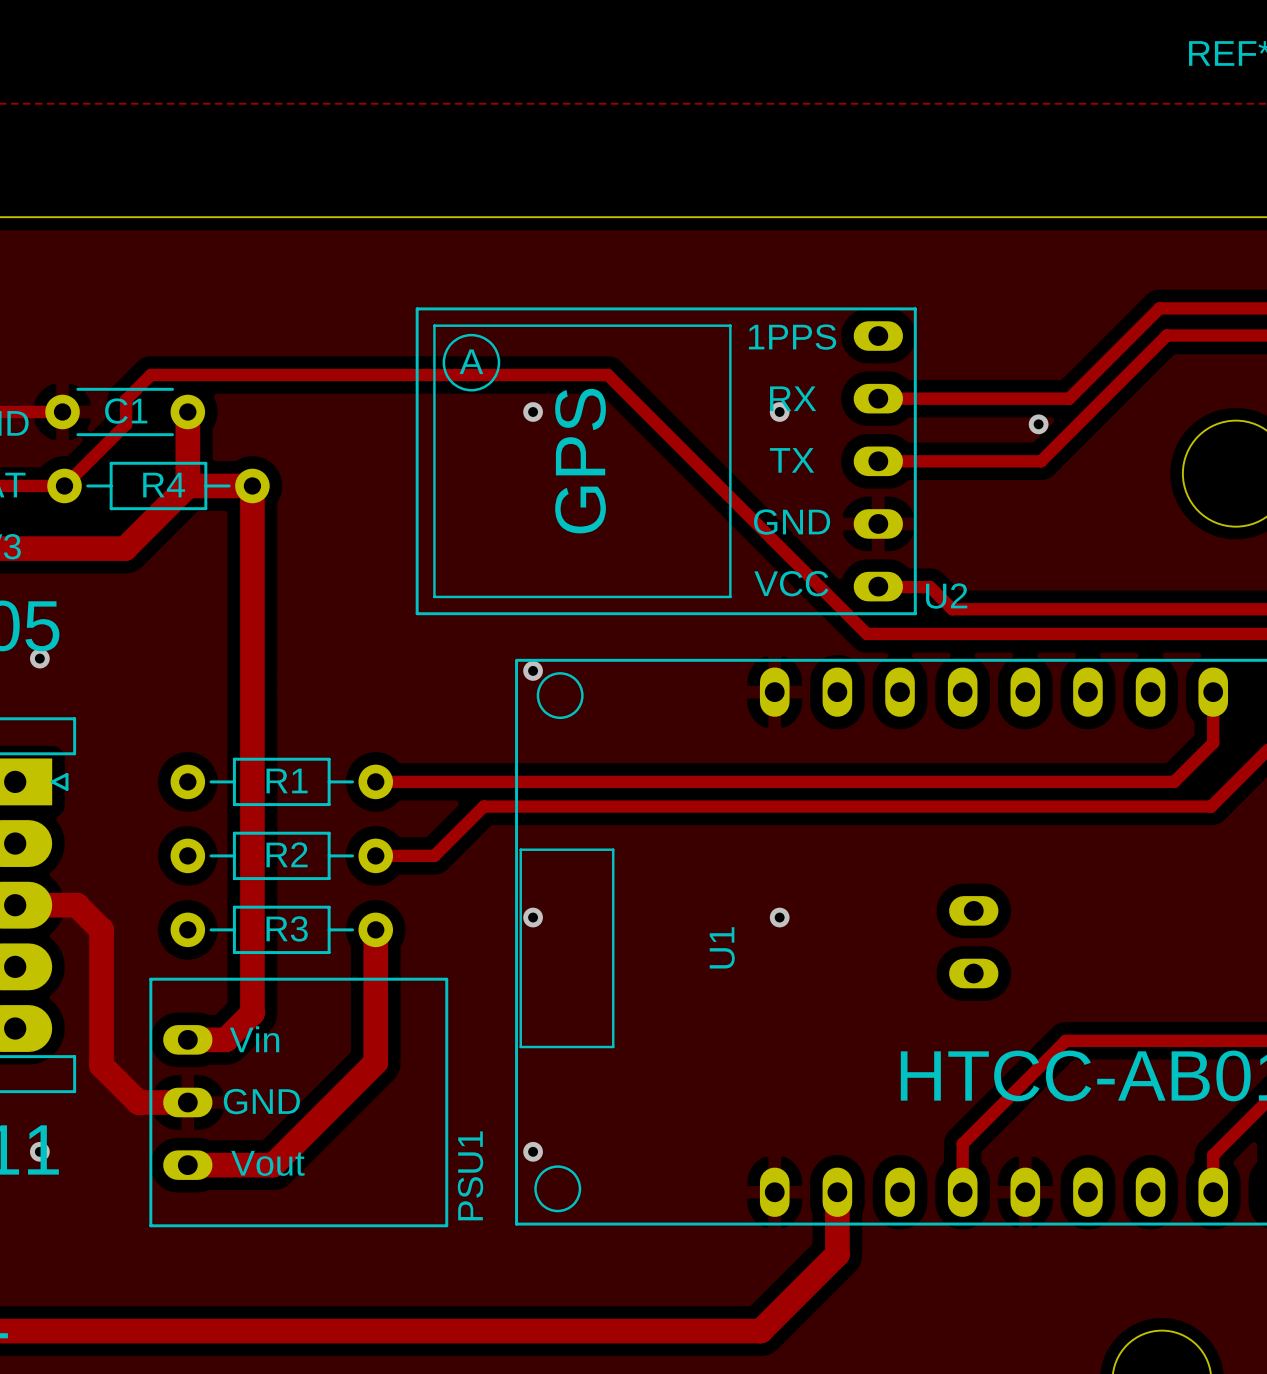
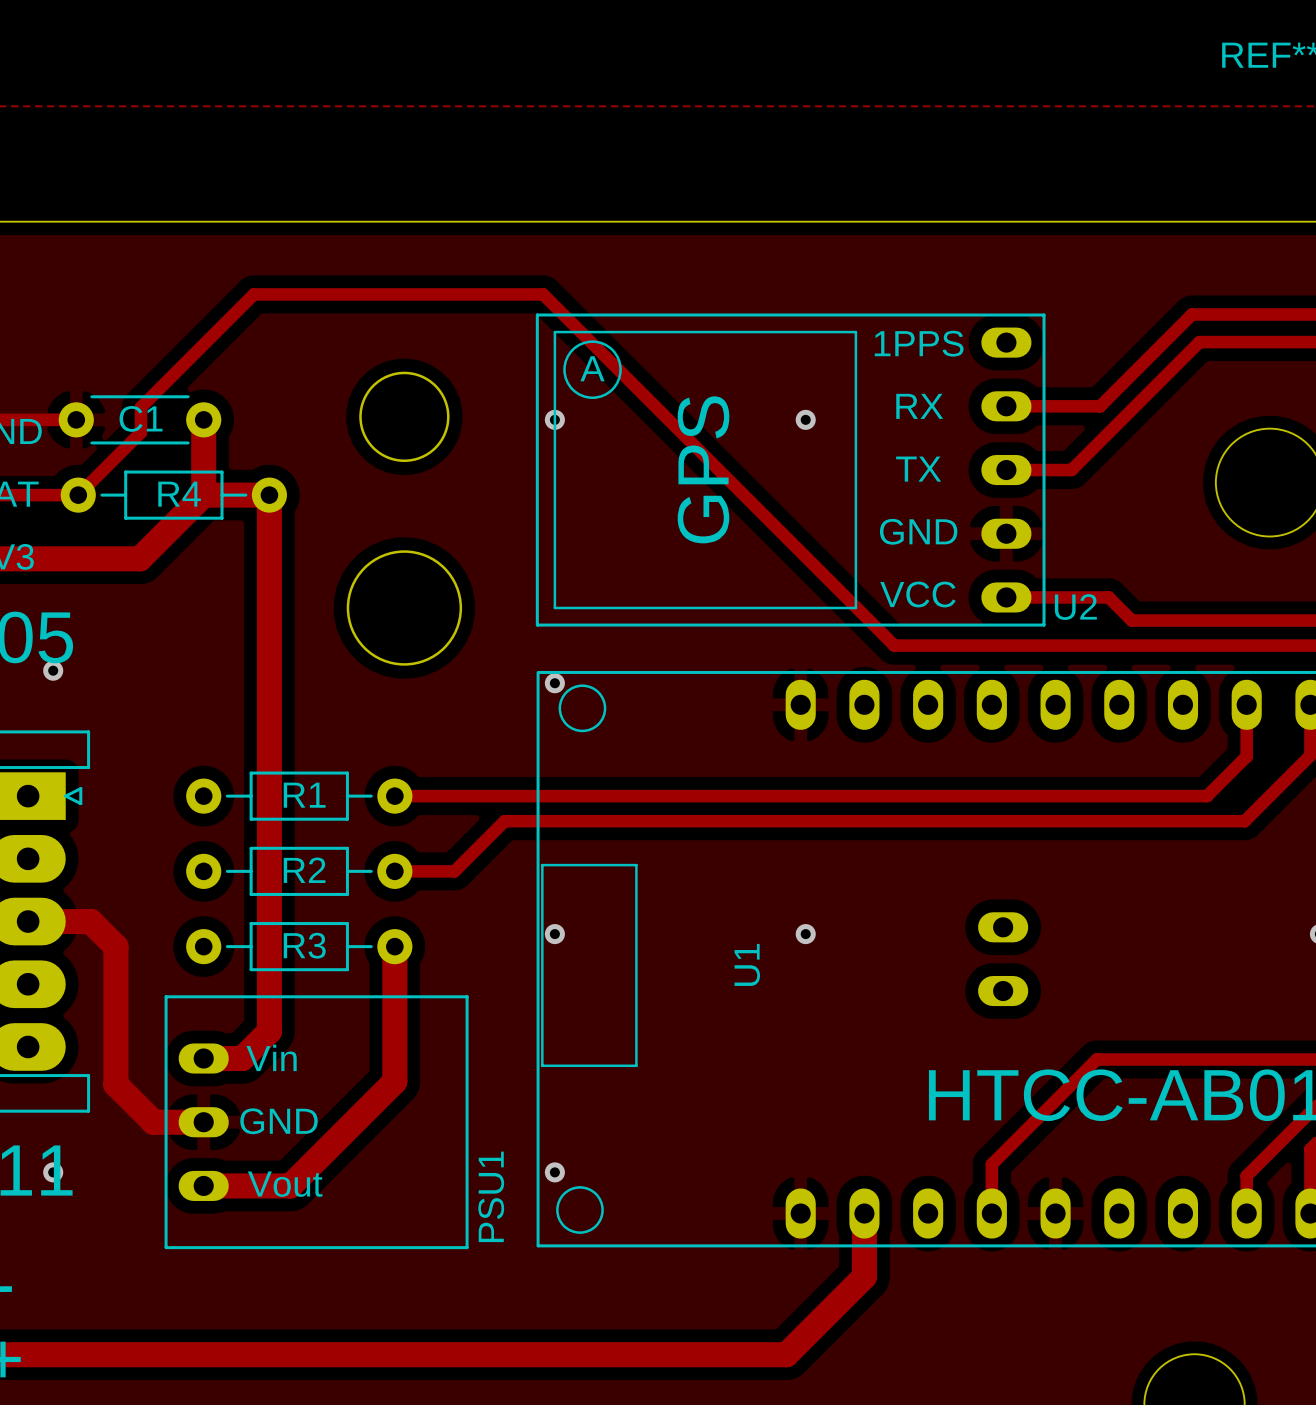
round board edge: none -> [359, 371, 450, 463]
track: (150, 375) (607, 375) -> (166, 382) (253, 294) (543, 294) (631, 382)
track: (878, 398) (976, 398) -> none
via: (1038, 424) -> none
U2 position: (666, 461) -> (790, 470)
track: (878, 461) (976, 461) -> none
round board edge: none -> [346, 550, 463, 666]
track: (878, 586) (930, 587) (952, 609) (1100, 609) -> (1006, 597) (1108, 597) (1131, 620)

